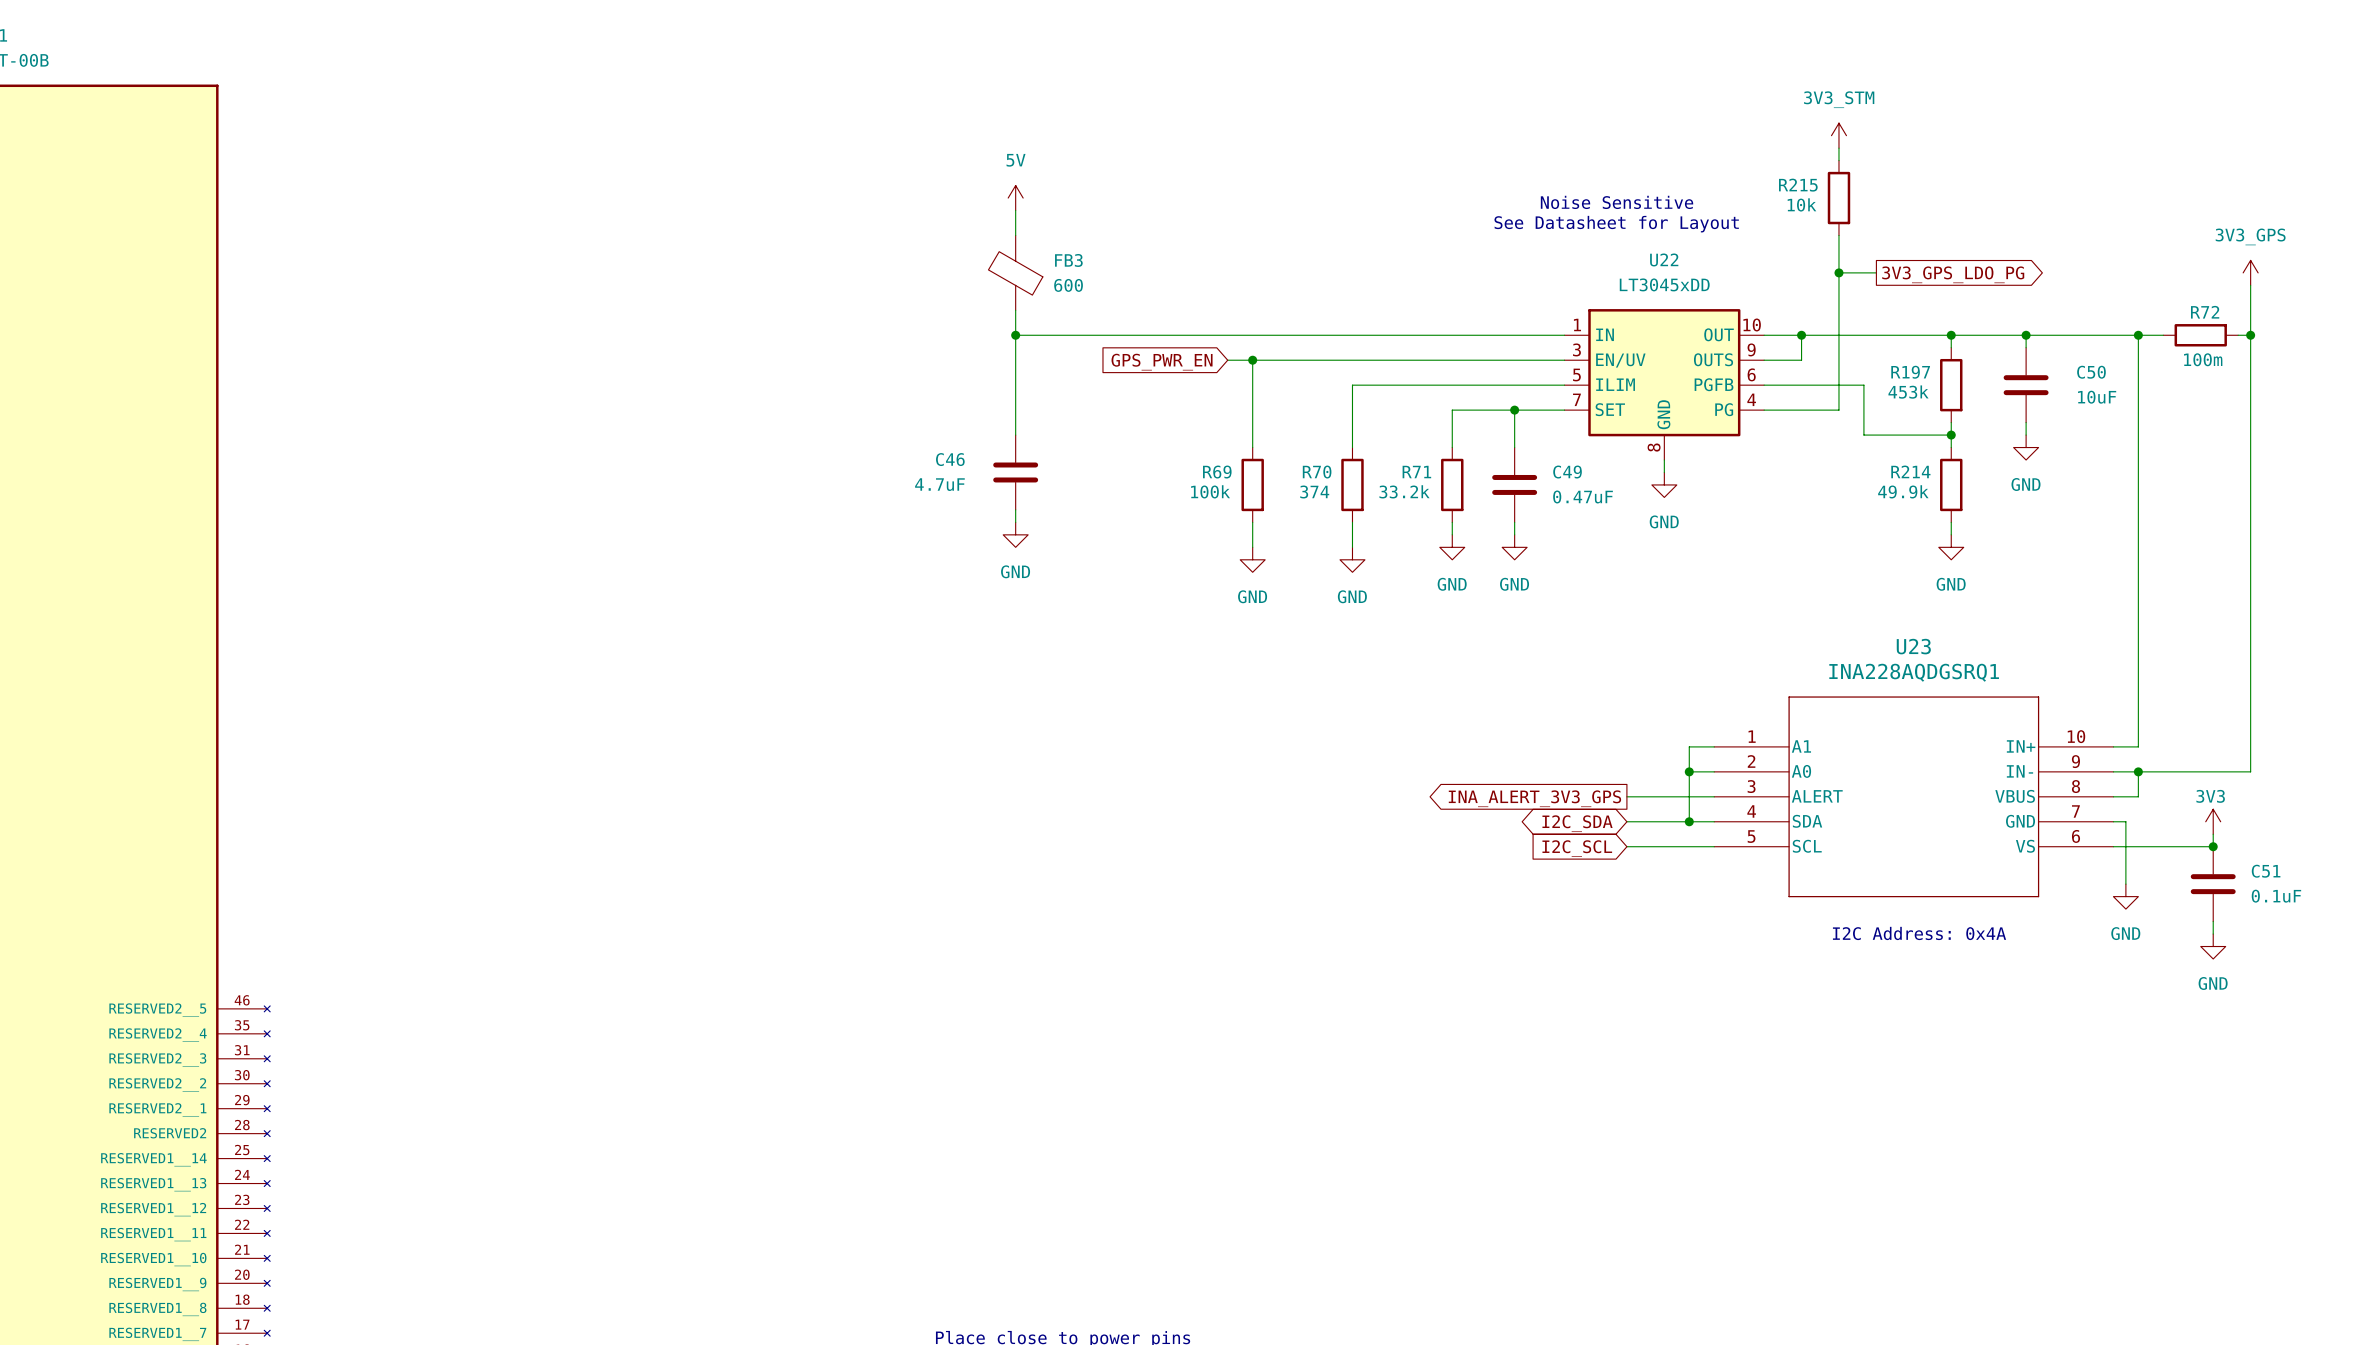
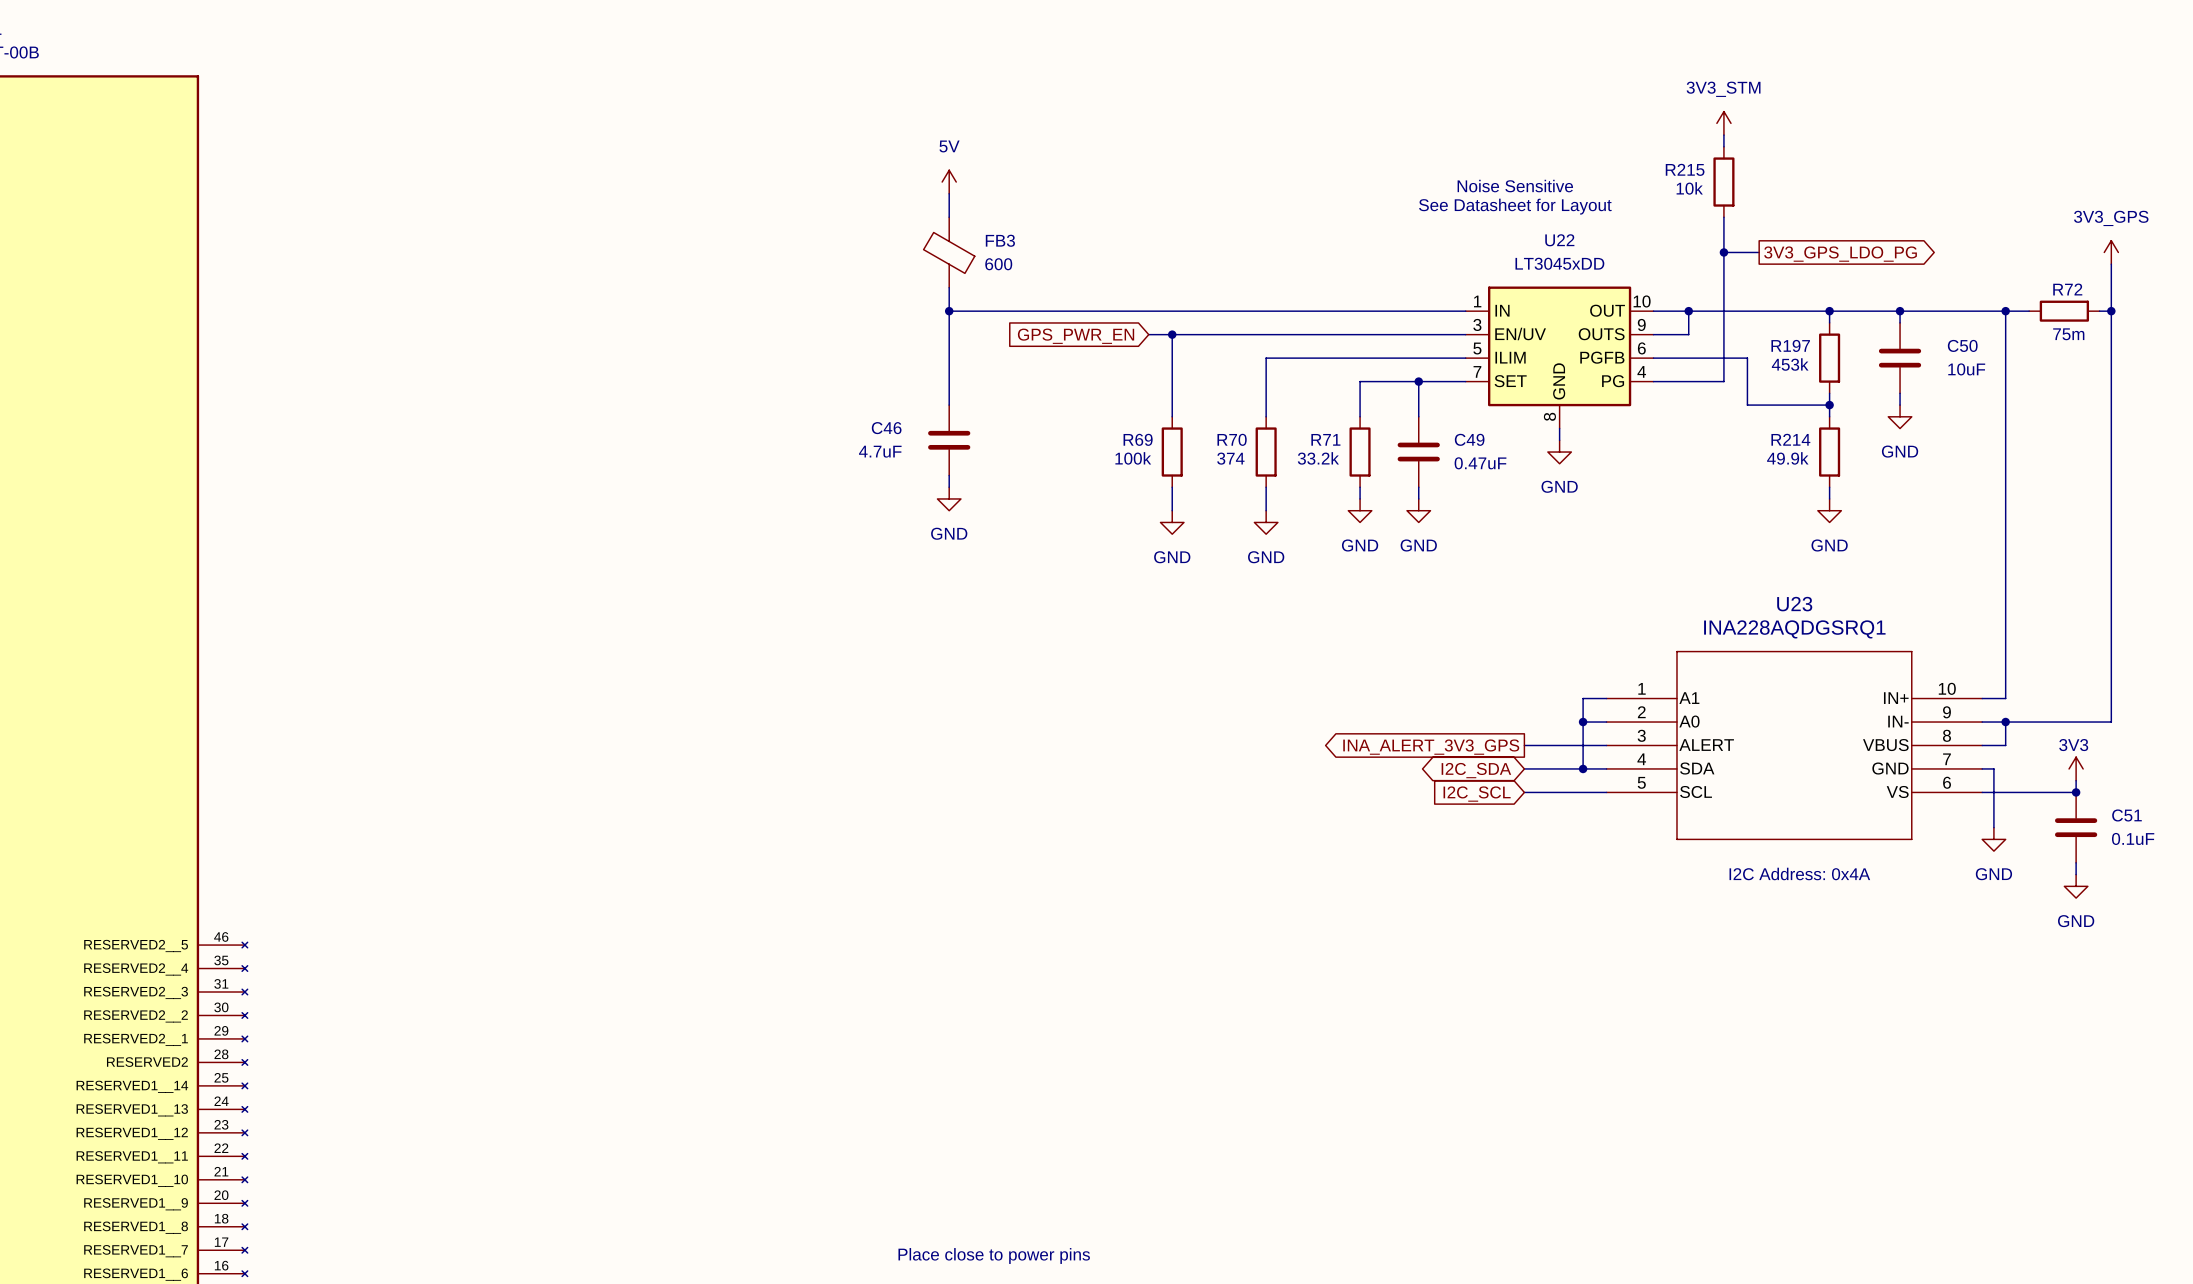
R72 value: 100m (2203, 359) -> 75m (2068, 334)

